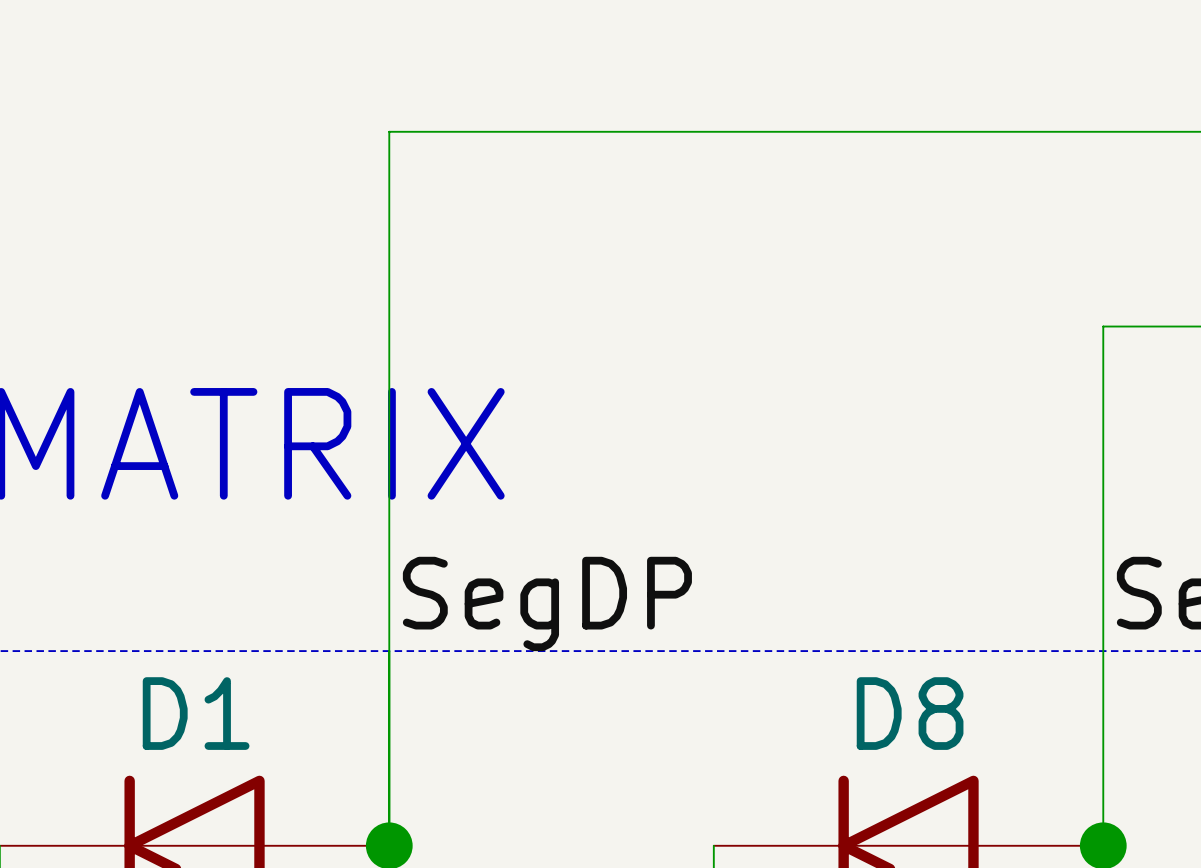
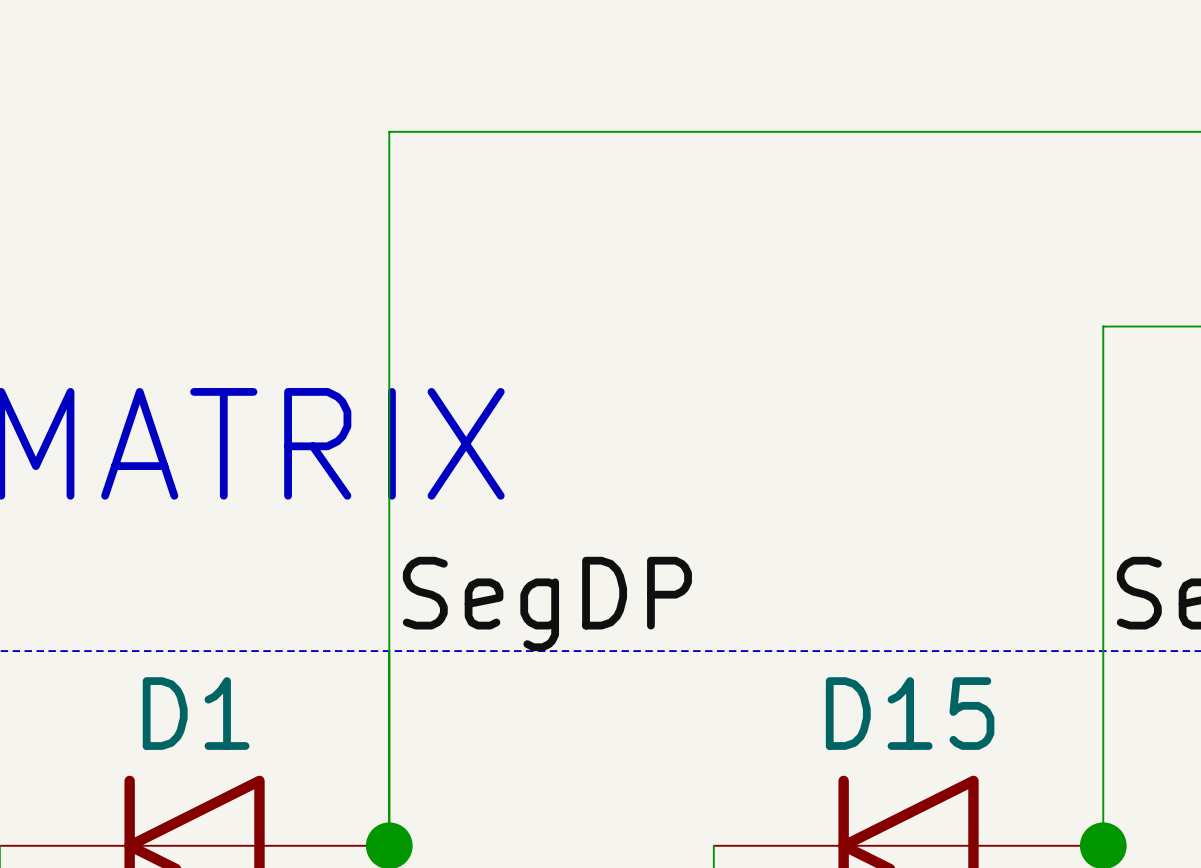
D8 name: D8 (910, 713) -> D15 (910, 713)

